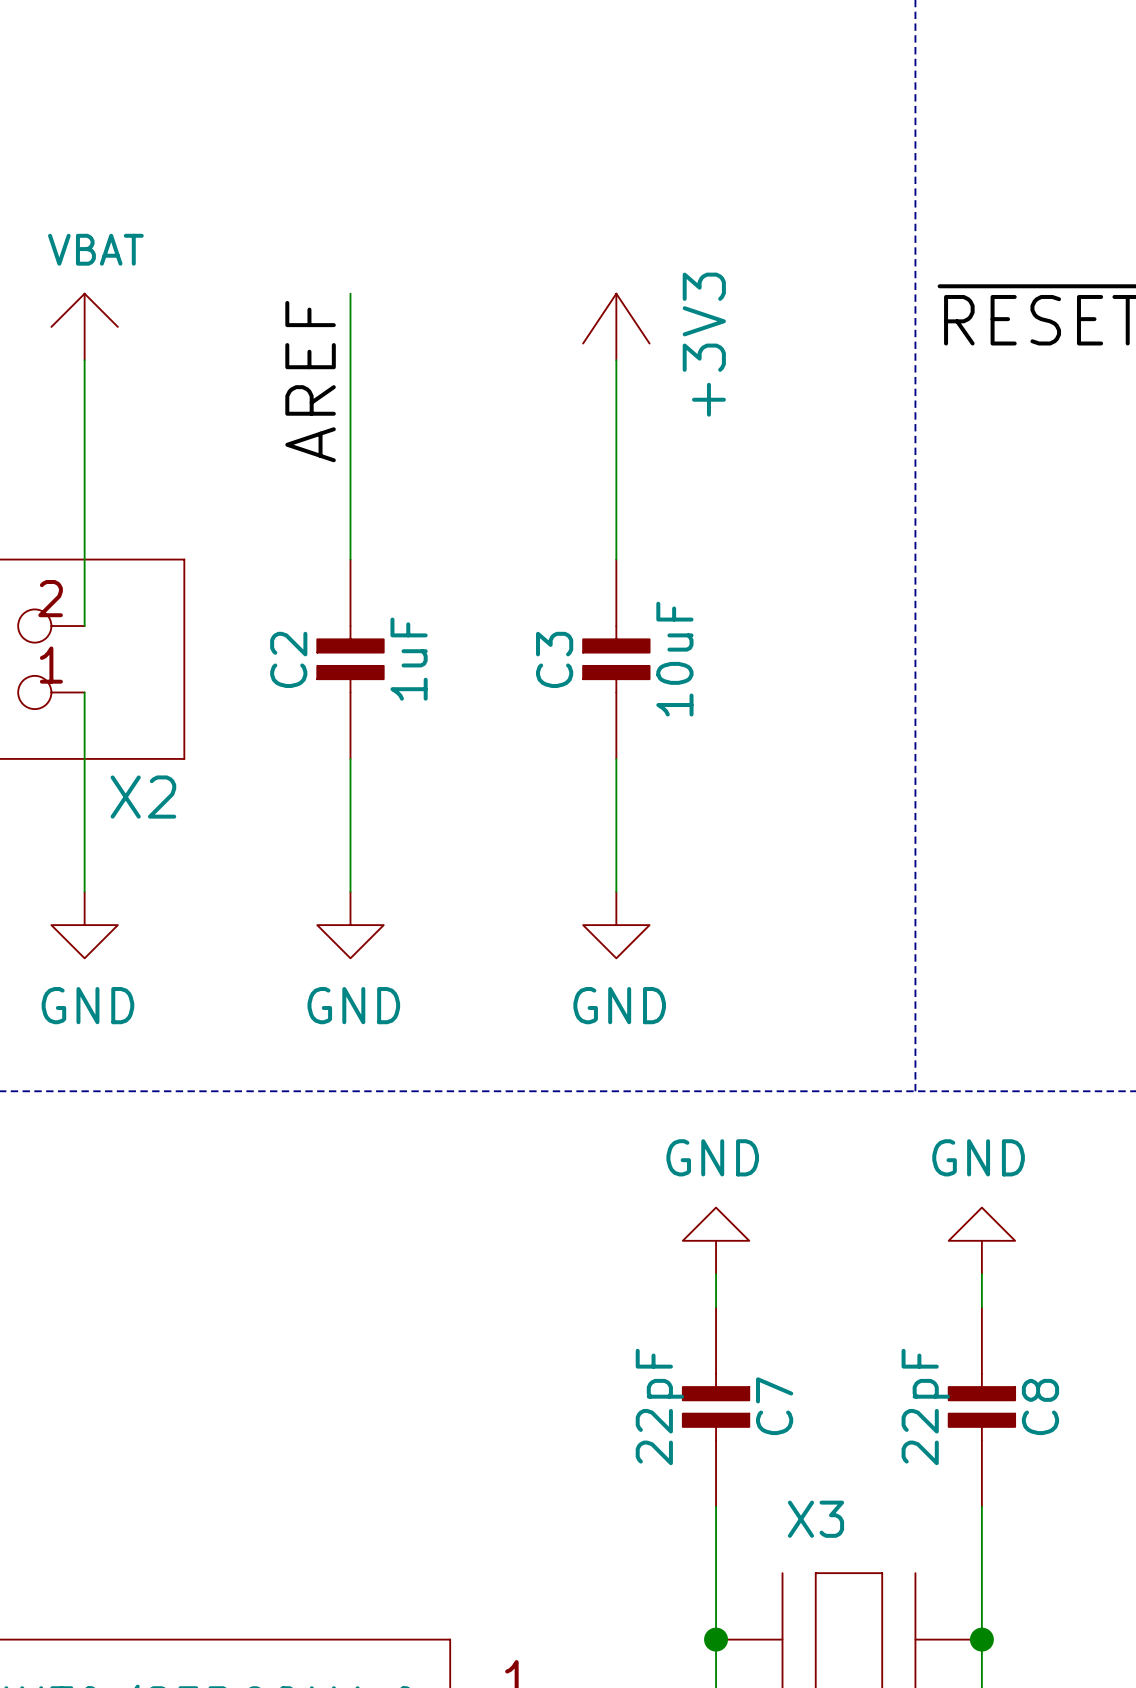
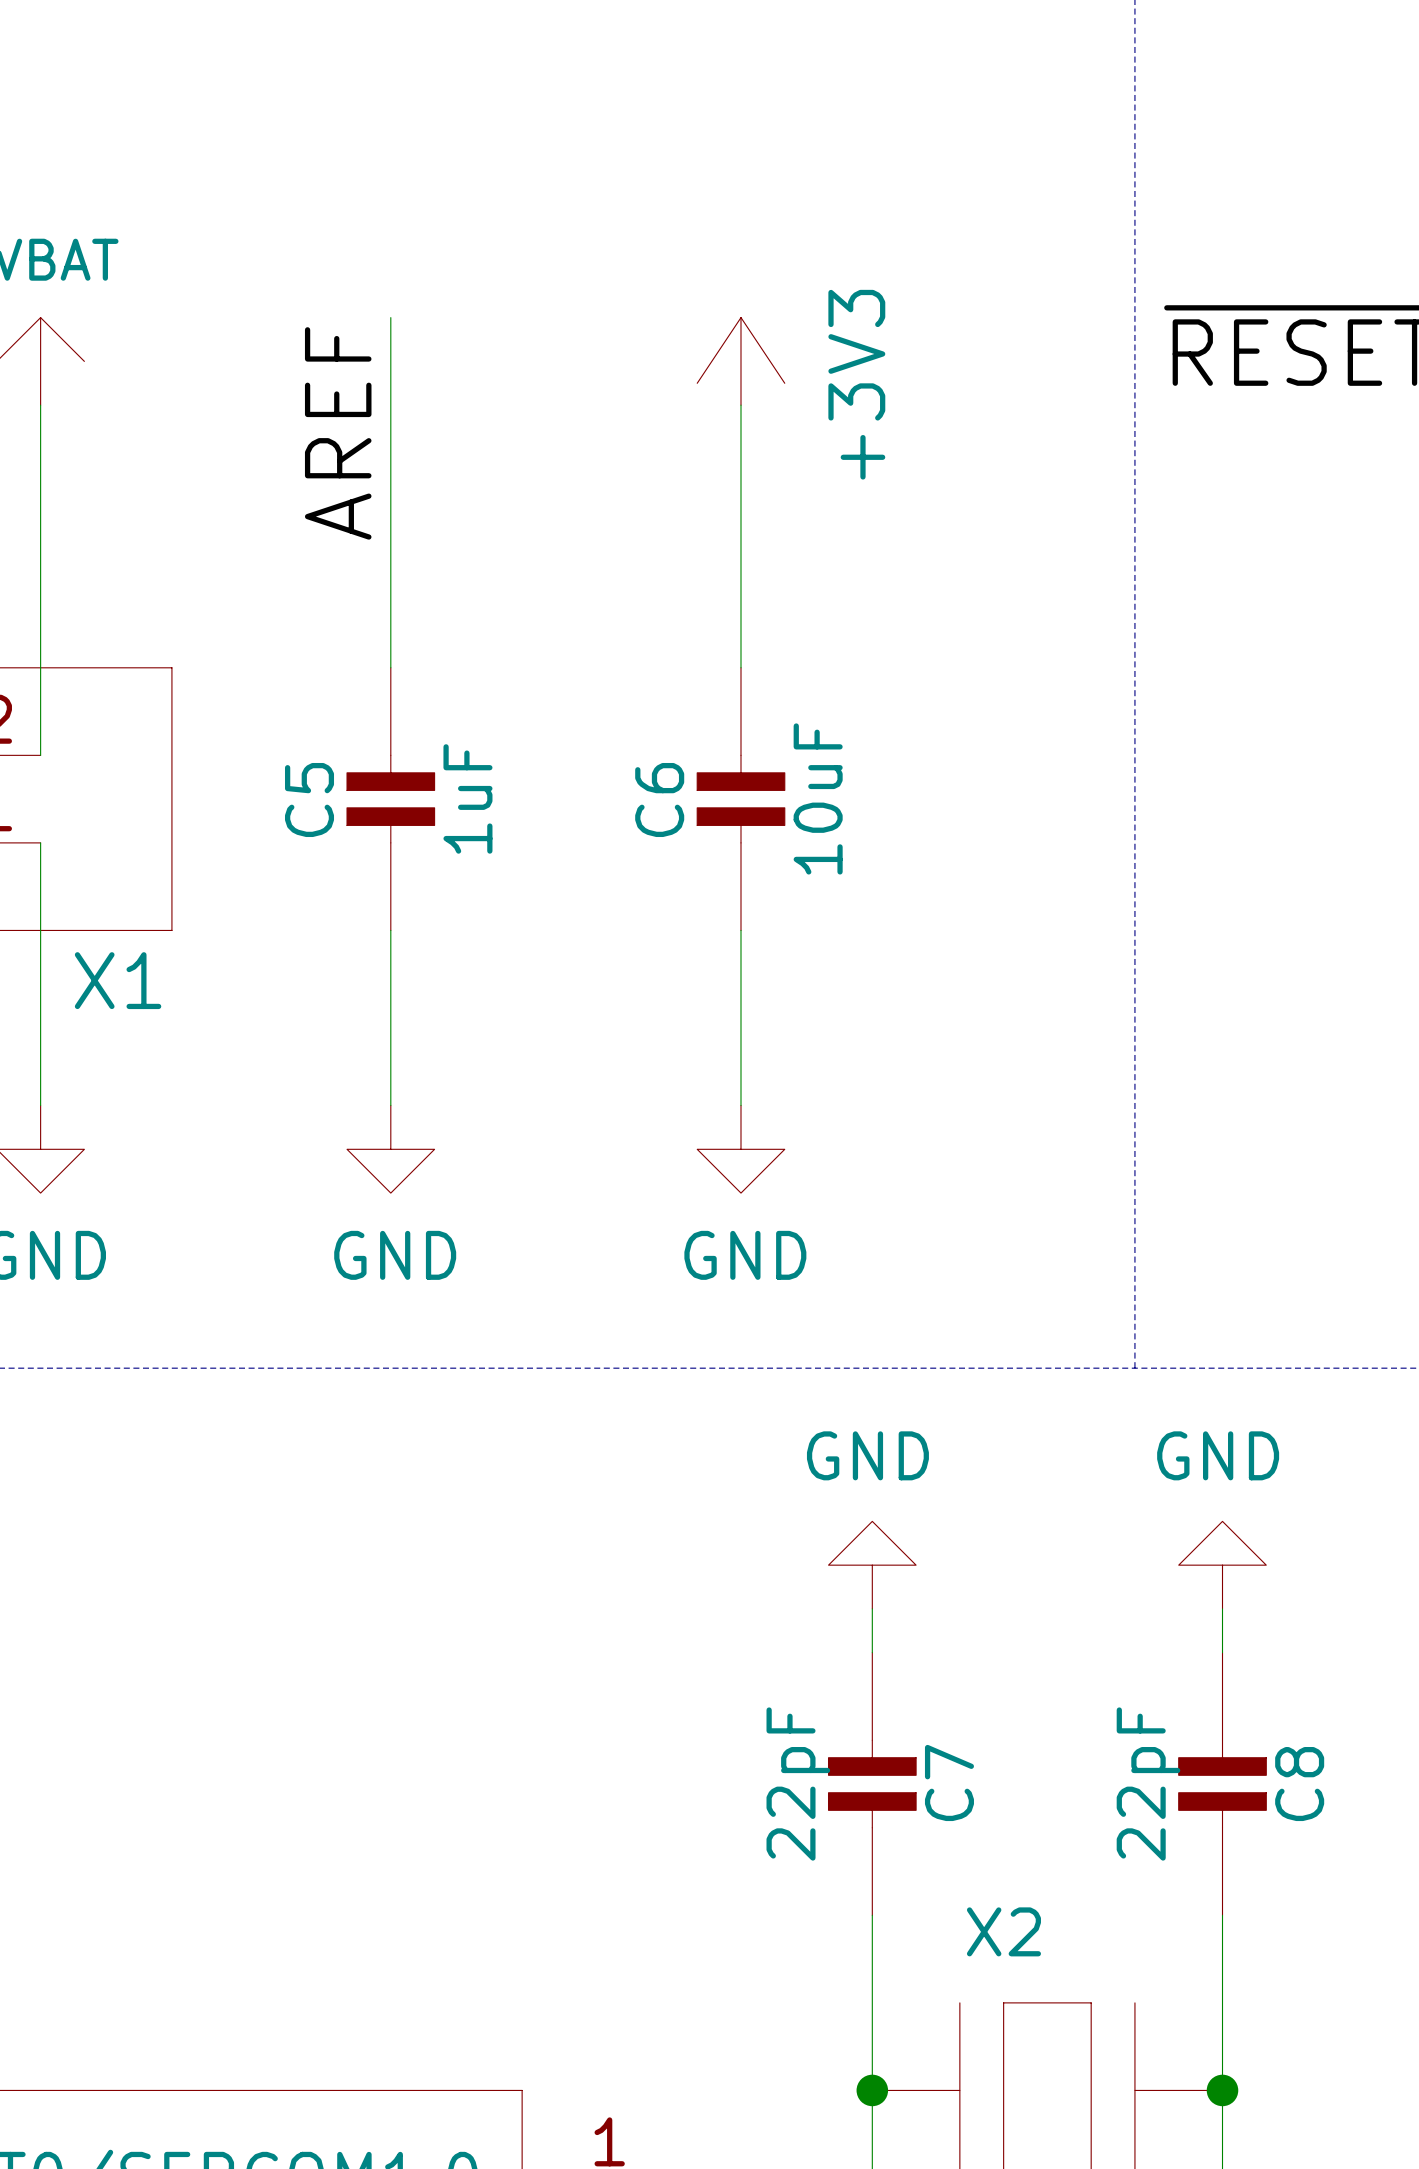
C2 name: C2 (288, 659) -> C5 (309, 800)
C3 name: C3 (554, 659) -> C6 (659, 800)
X2 name: X2 (143, 797) -> X1 (118, 980)
X3 name: X3 (815, 1519) -> X2 (1003, 1931)

